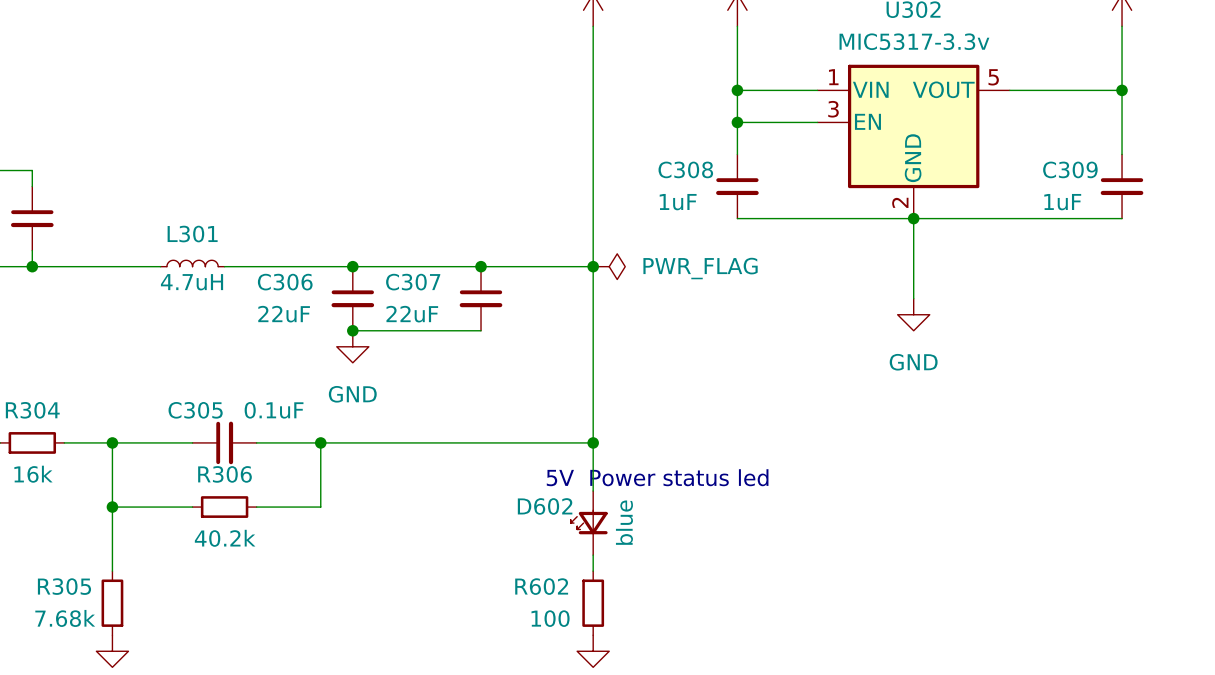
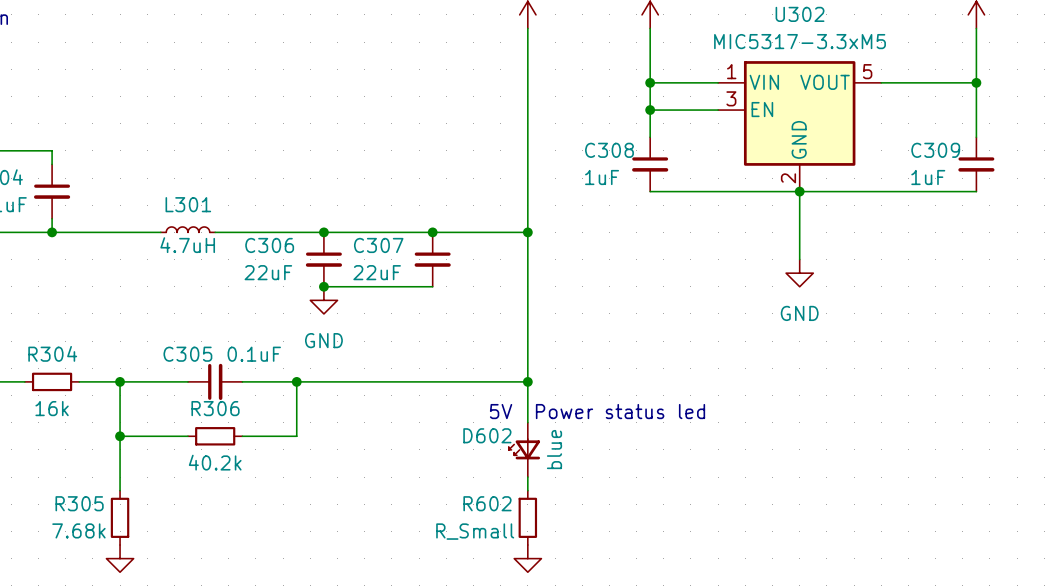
U302 value: MIC5317-3.3v (914, 41) -> MIC5317-3.3xM5 (800, 41)
power symbol: PWR_FLAG (609, 266) -> none
R602 value: 100 (550, 618) -> R_Small (475, 531)

